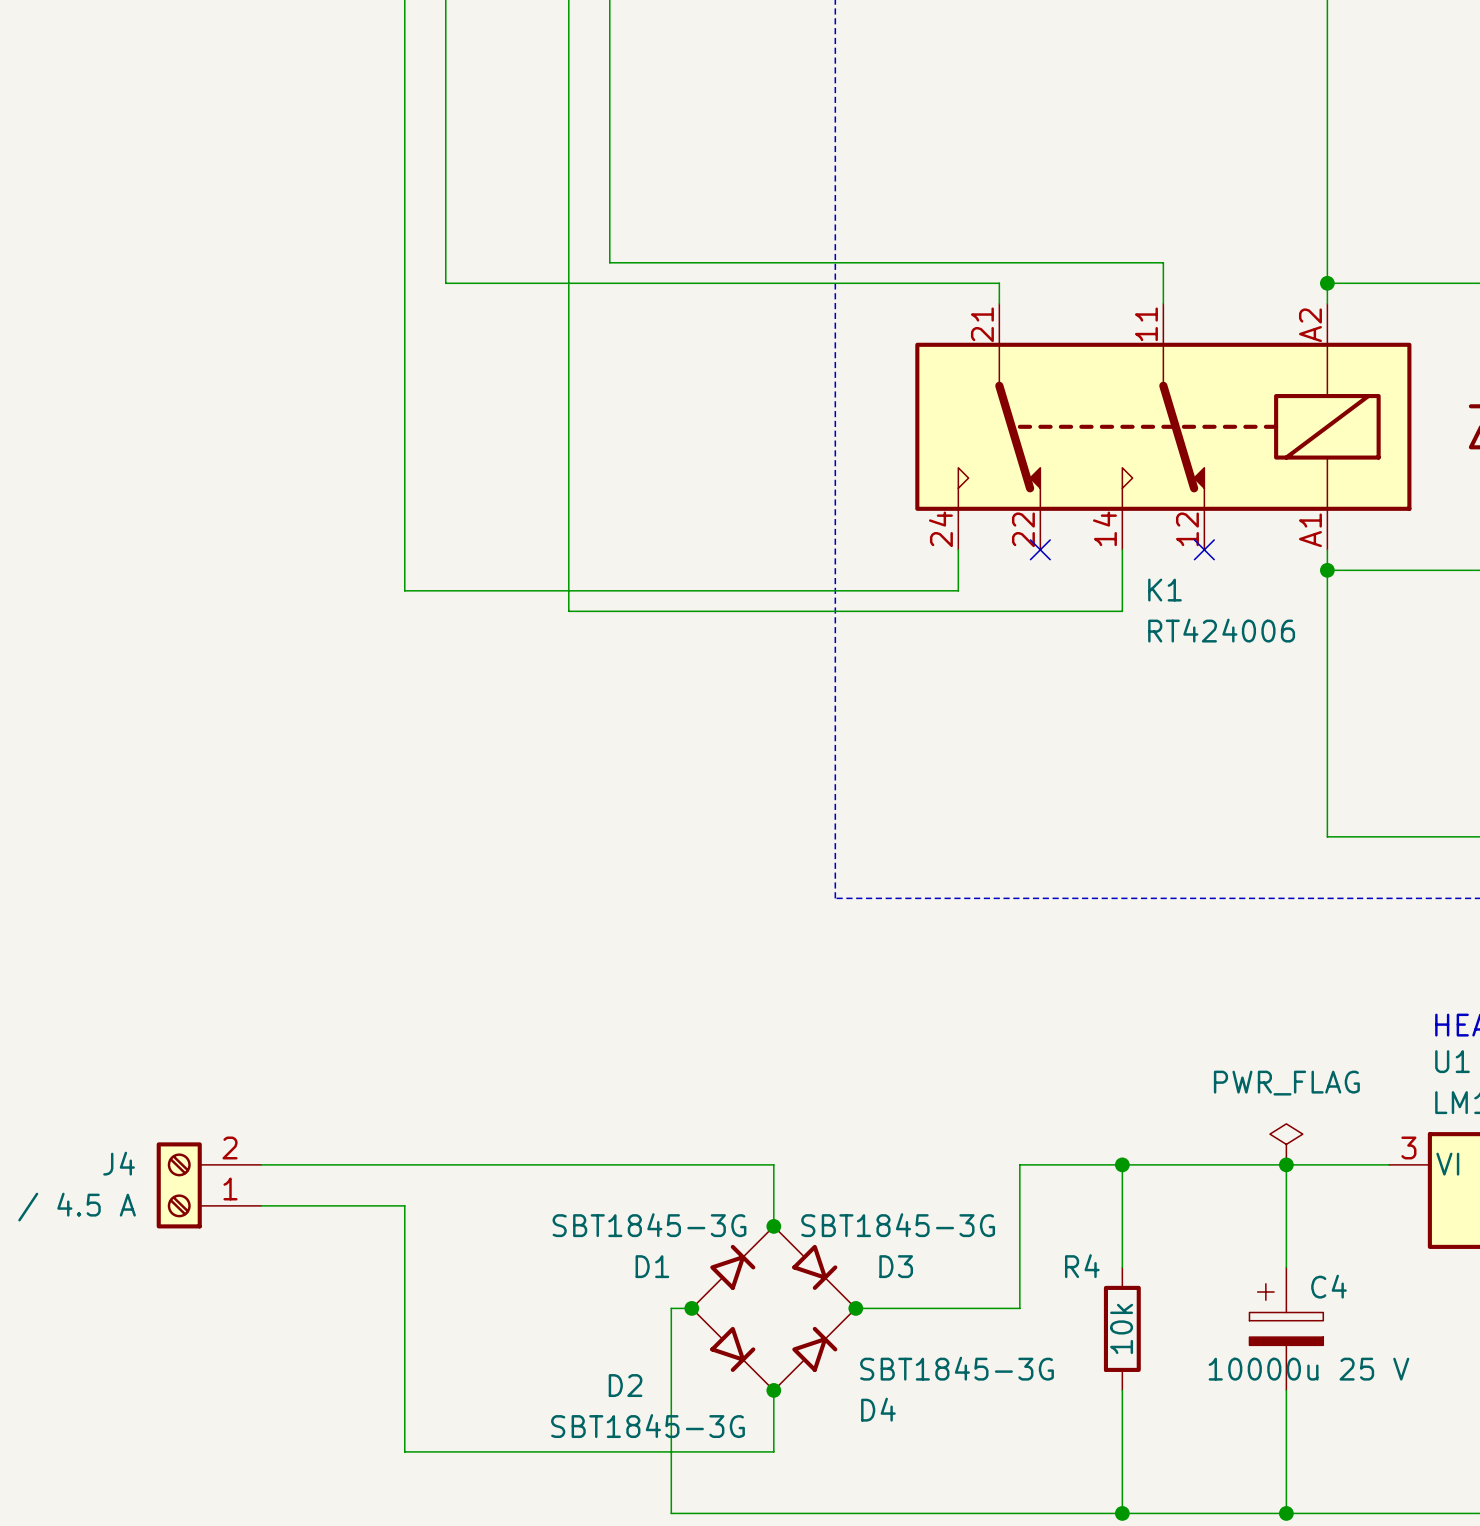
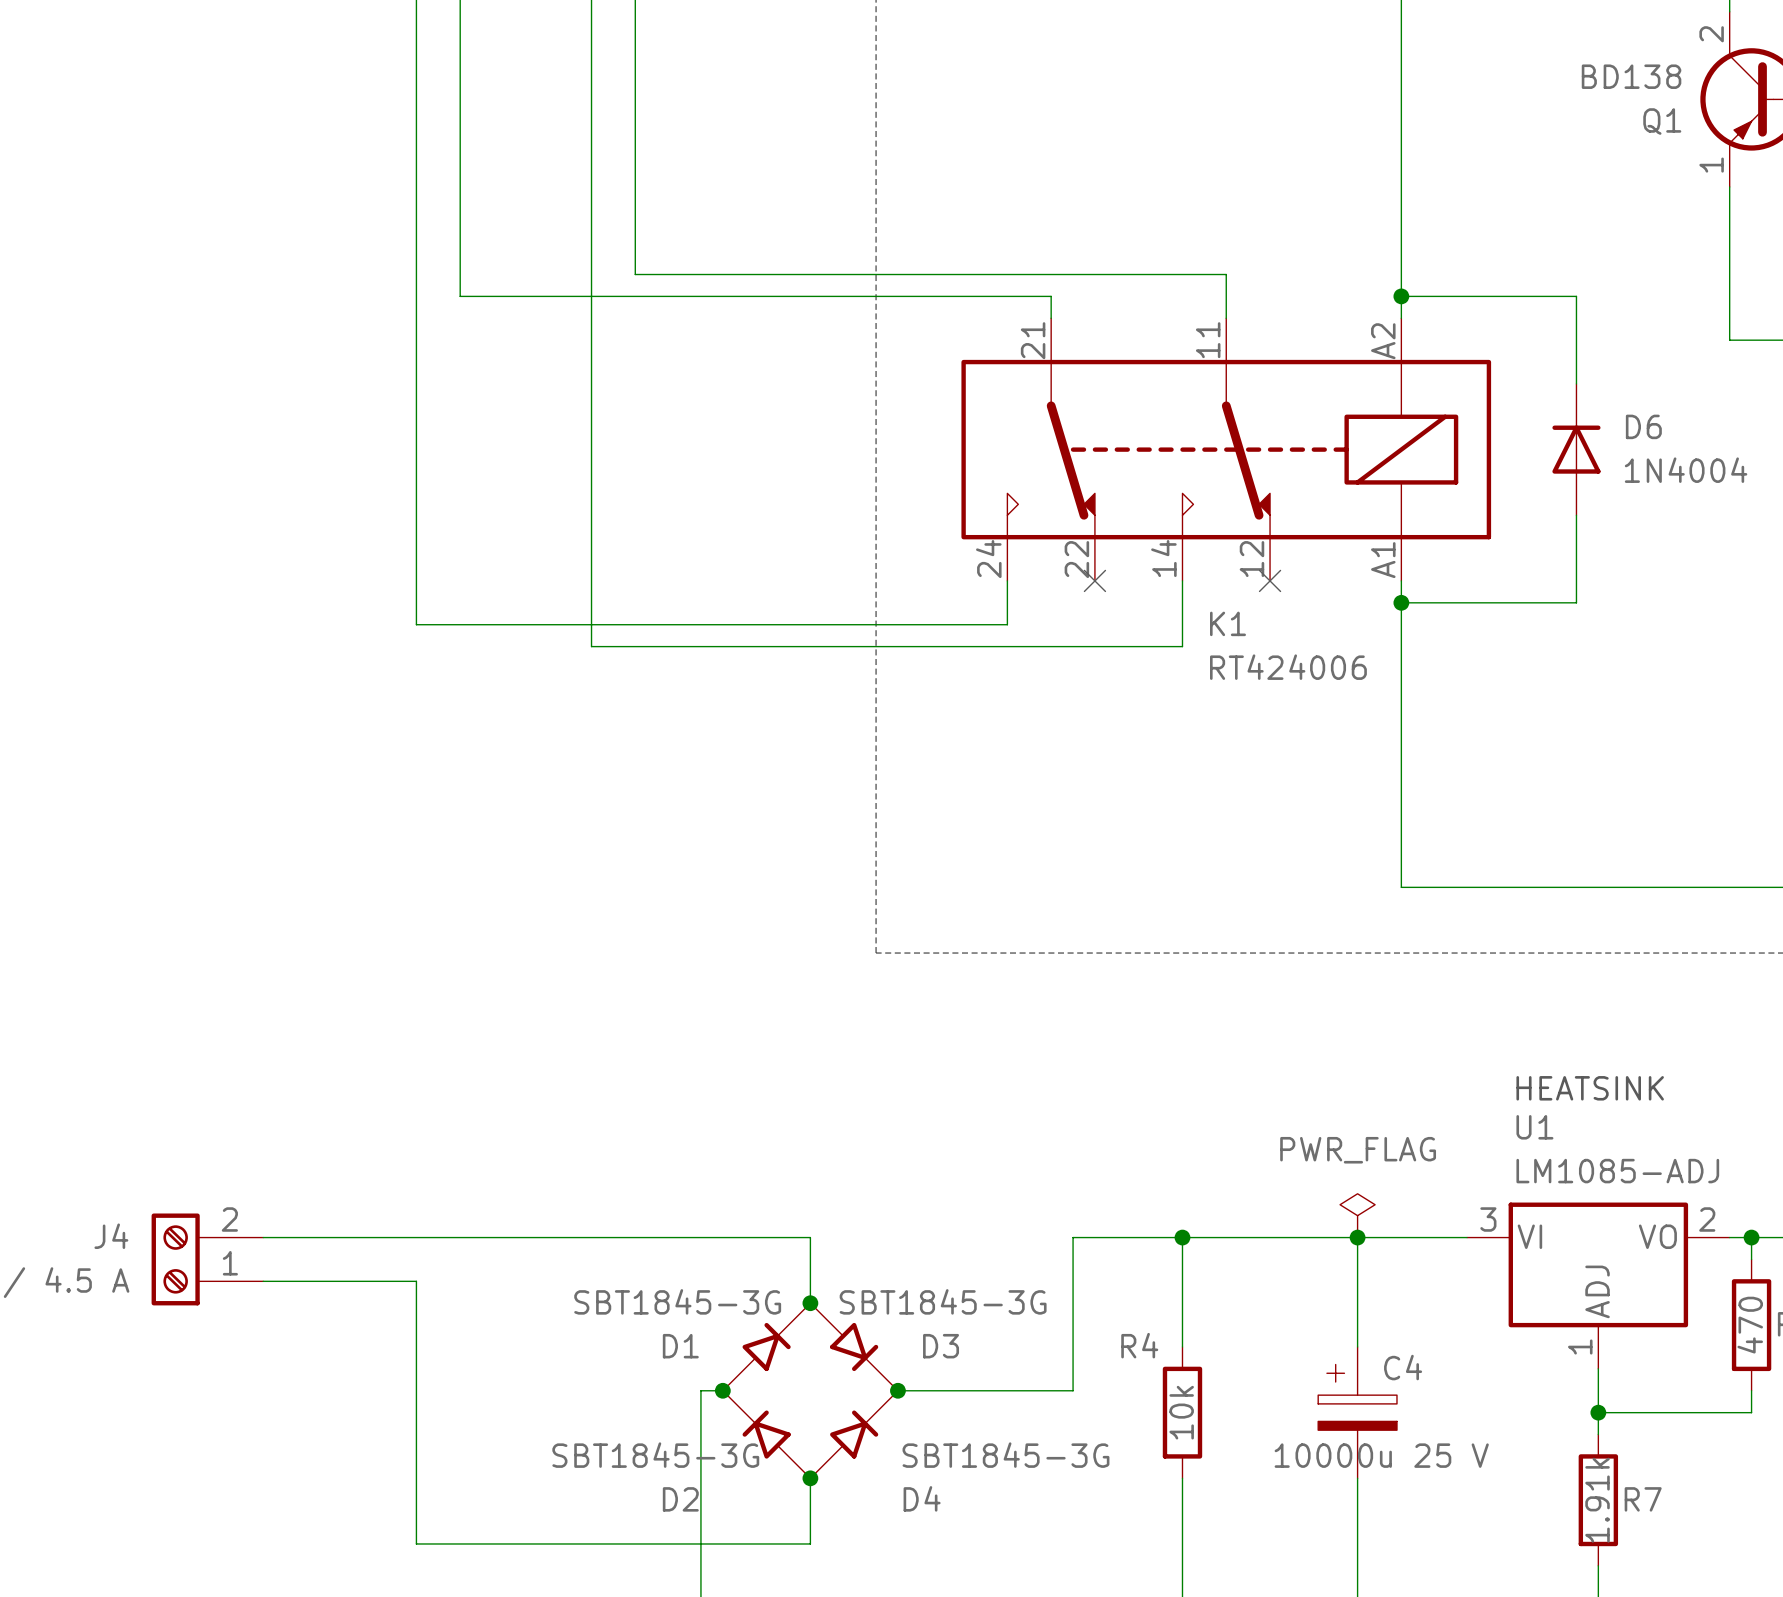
D2 rotation: 0° (732, 1349) -> 180° (766, 1434)
D2 name position: D2 (625, 1385) -> D2 (680, 1499)
D2 value position: SBT1845-3G (648, 1426) -> SBT1845-3G (655, 1455)

